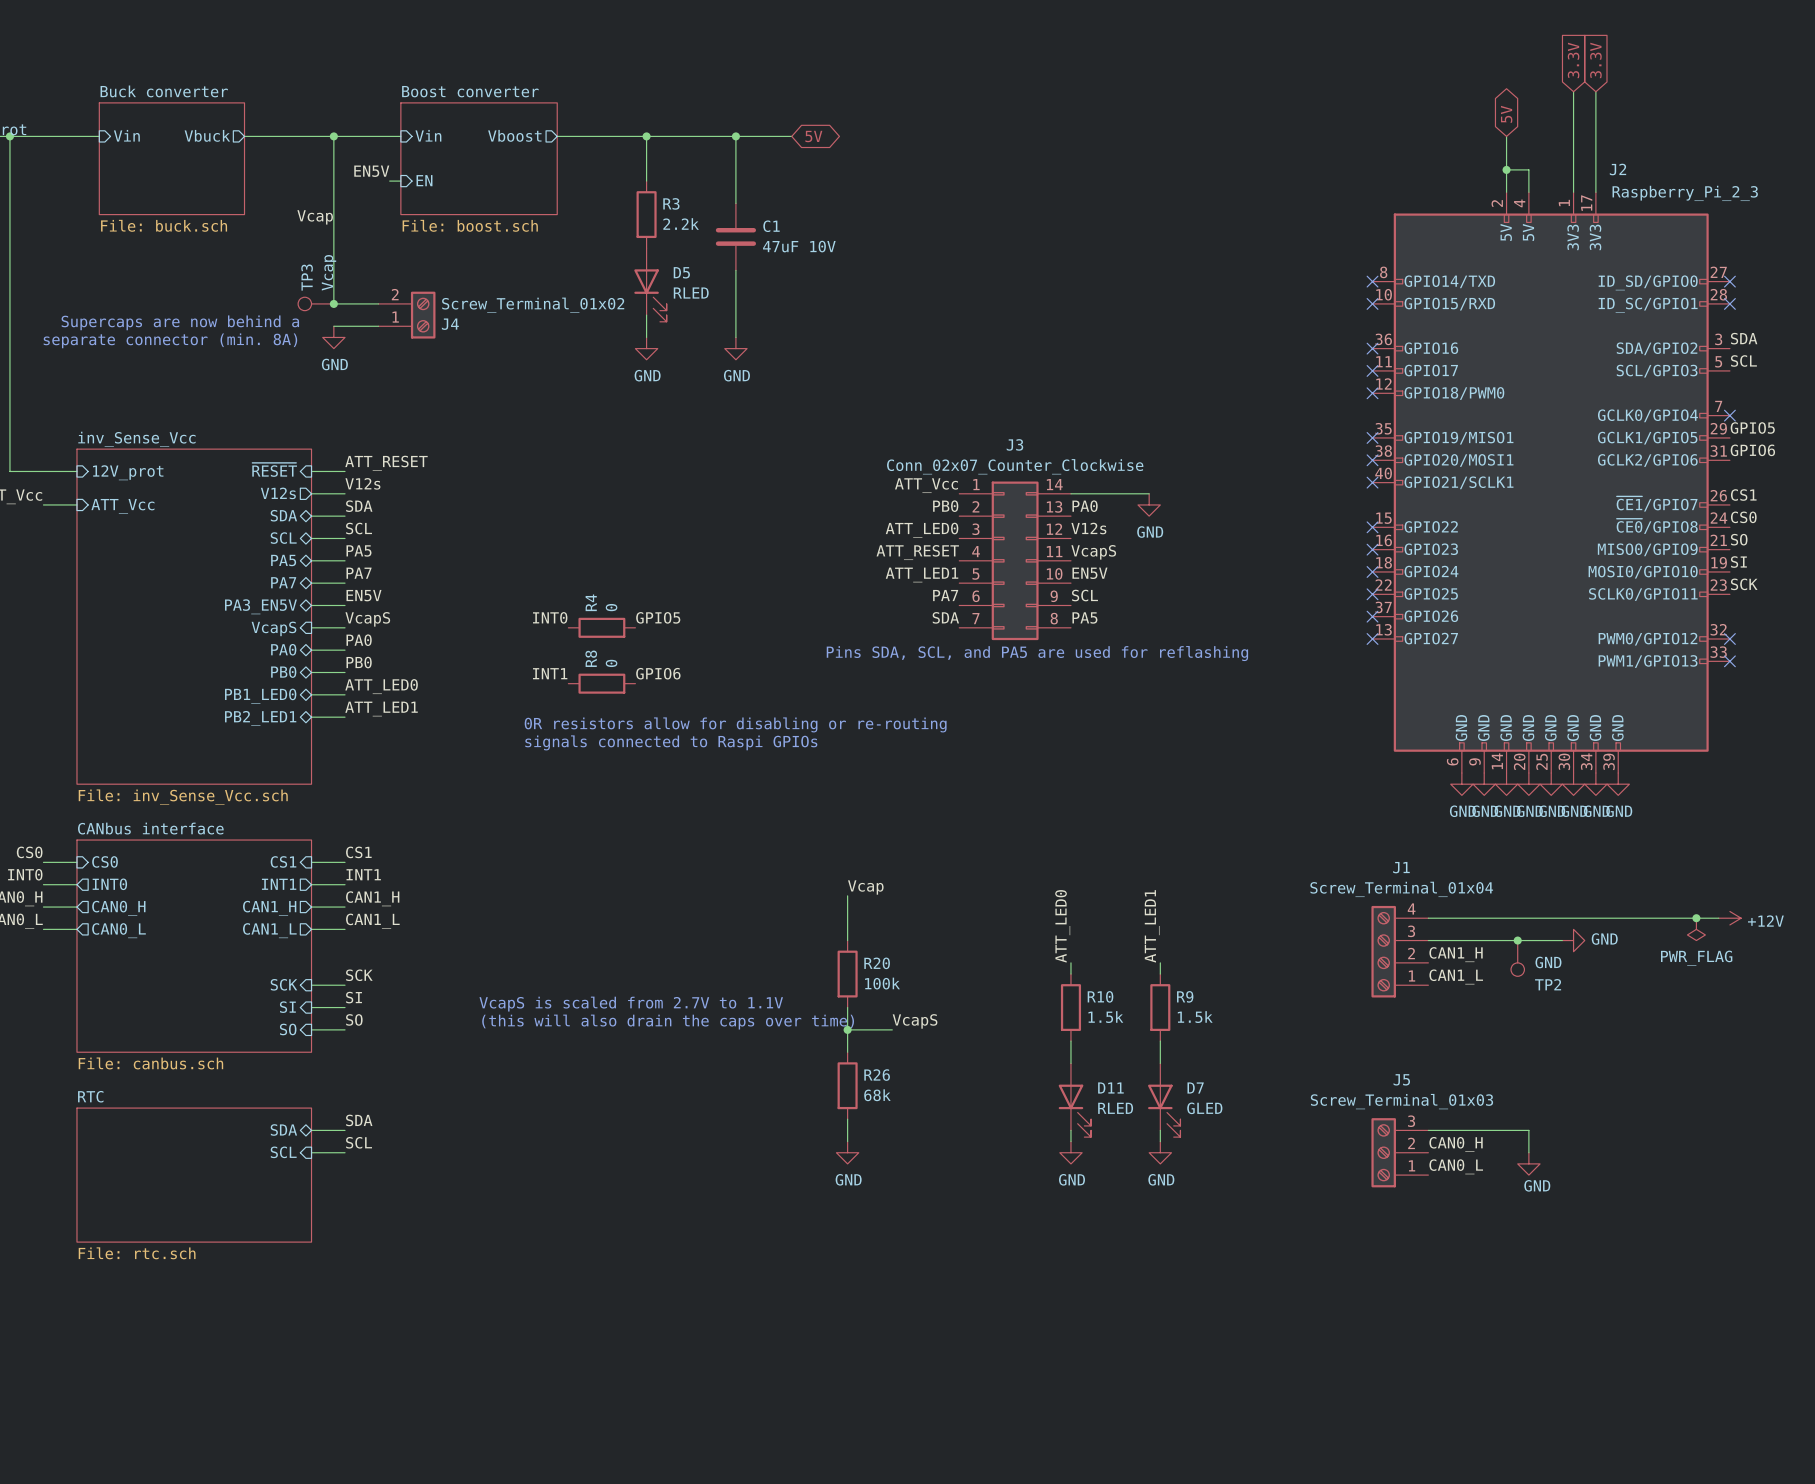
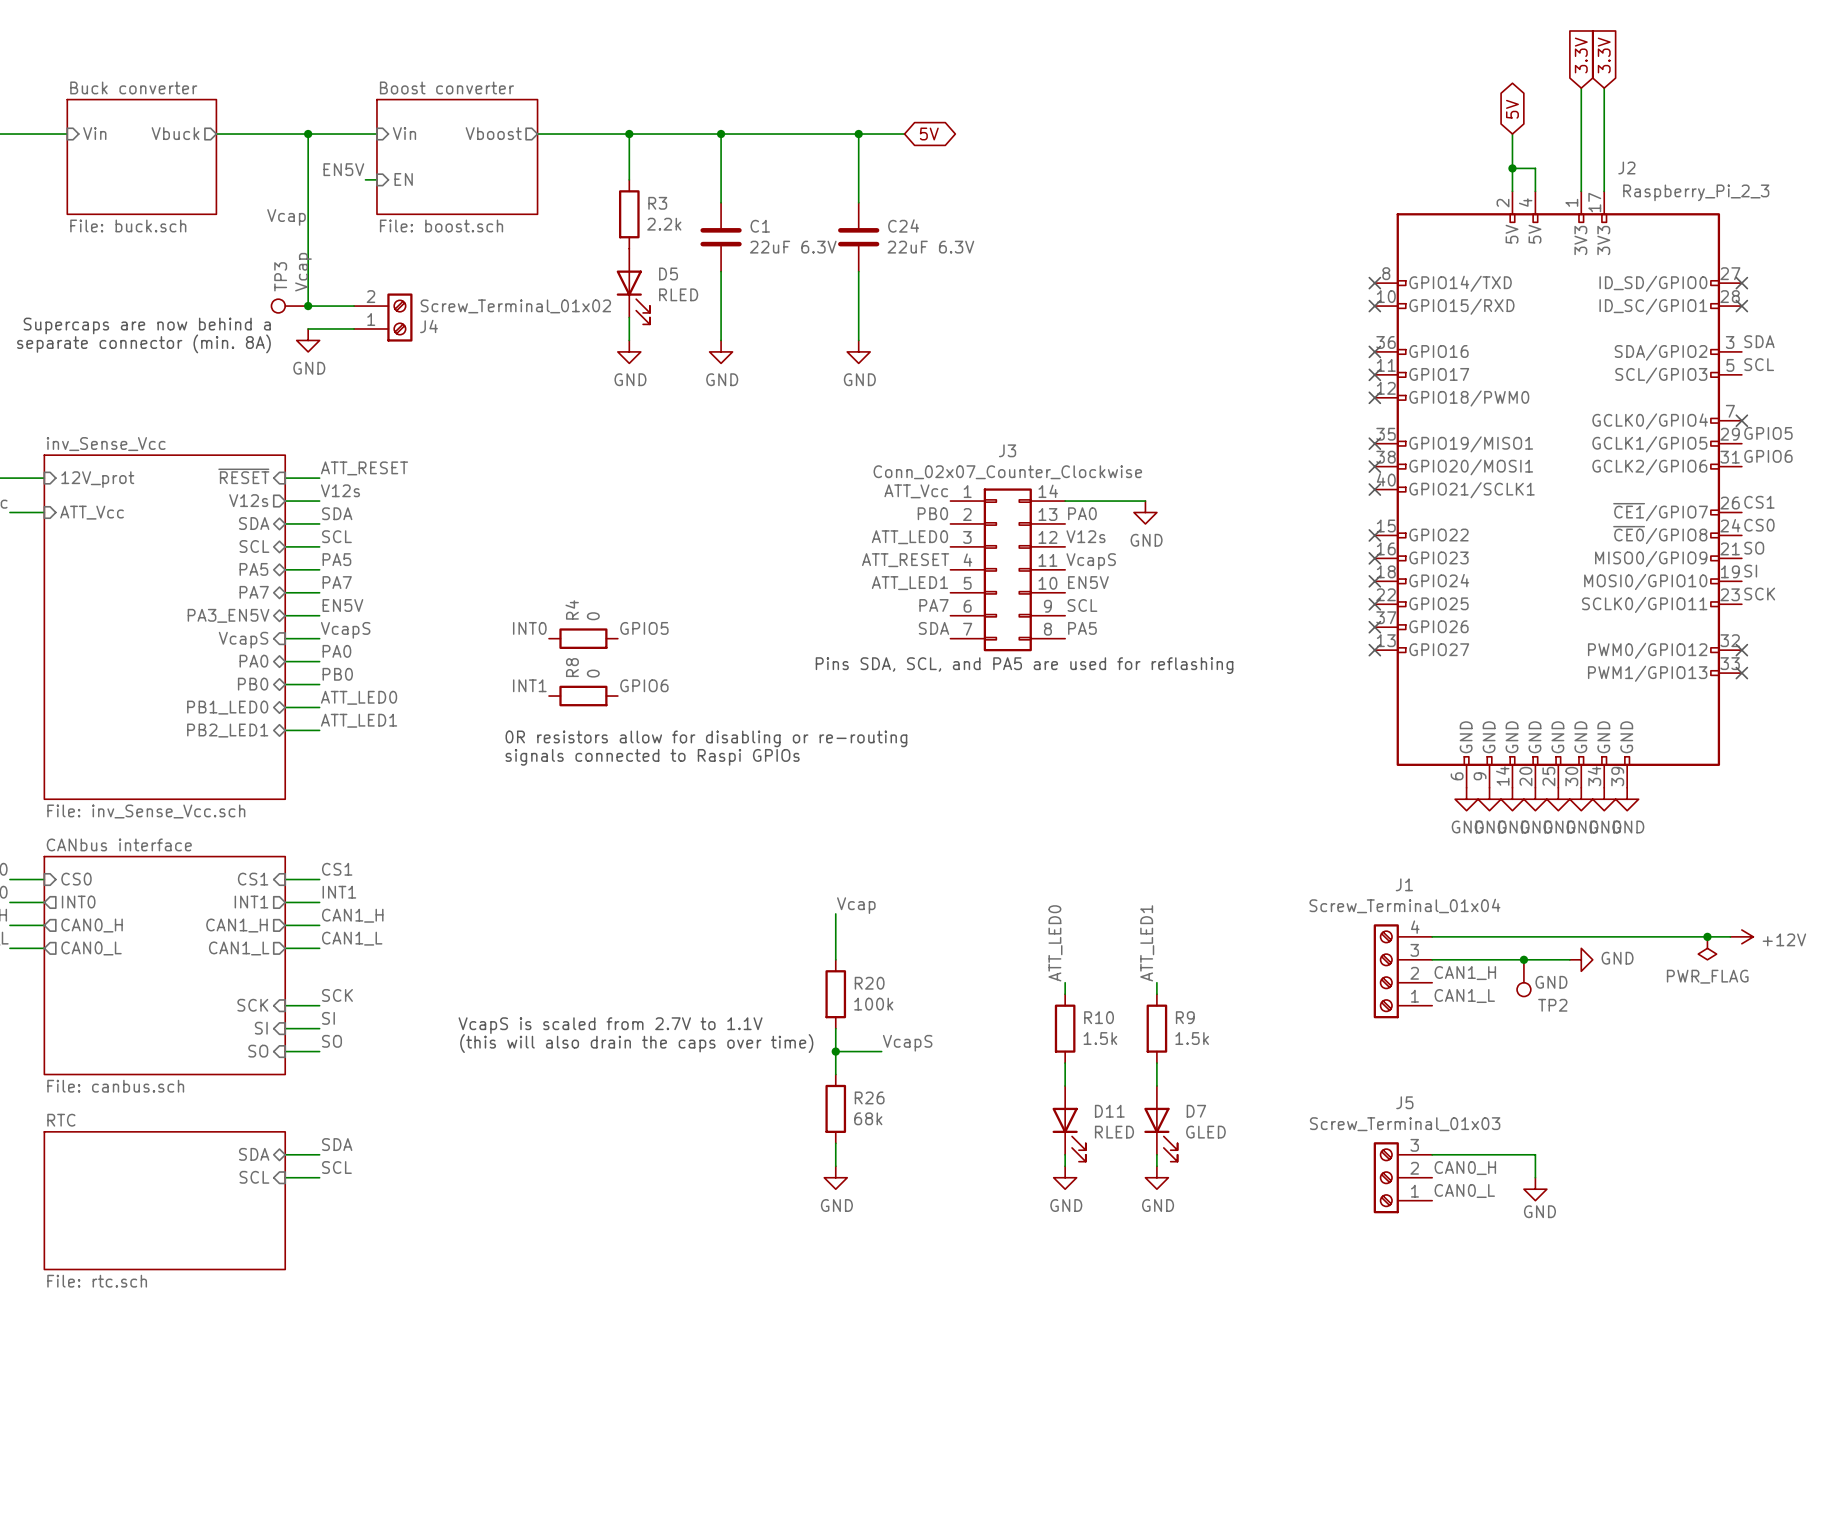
wire: none -> (778, 134) (904, 134)
global label position: 5V (813, 136) -> 5V (929, 134)
wire: none -> (858, 134) (858, 202)
junction: none -> (858, 134)
C24: none -> 22uF 6.3V (858, 237)
C1 value: 47uF 10V (799, 246) -> 22uF 6.3V (793, 247)
wire: none -> (858, 271) (858, 340)
power symbol: none -> GND (858, 351)

